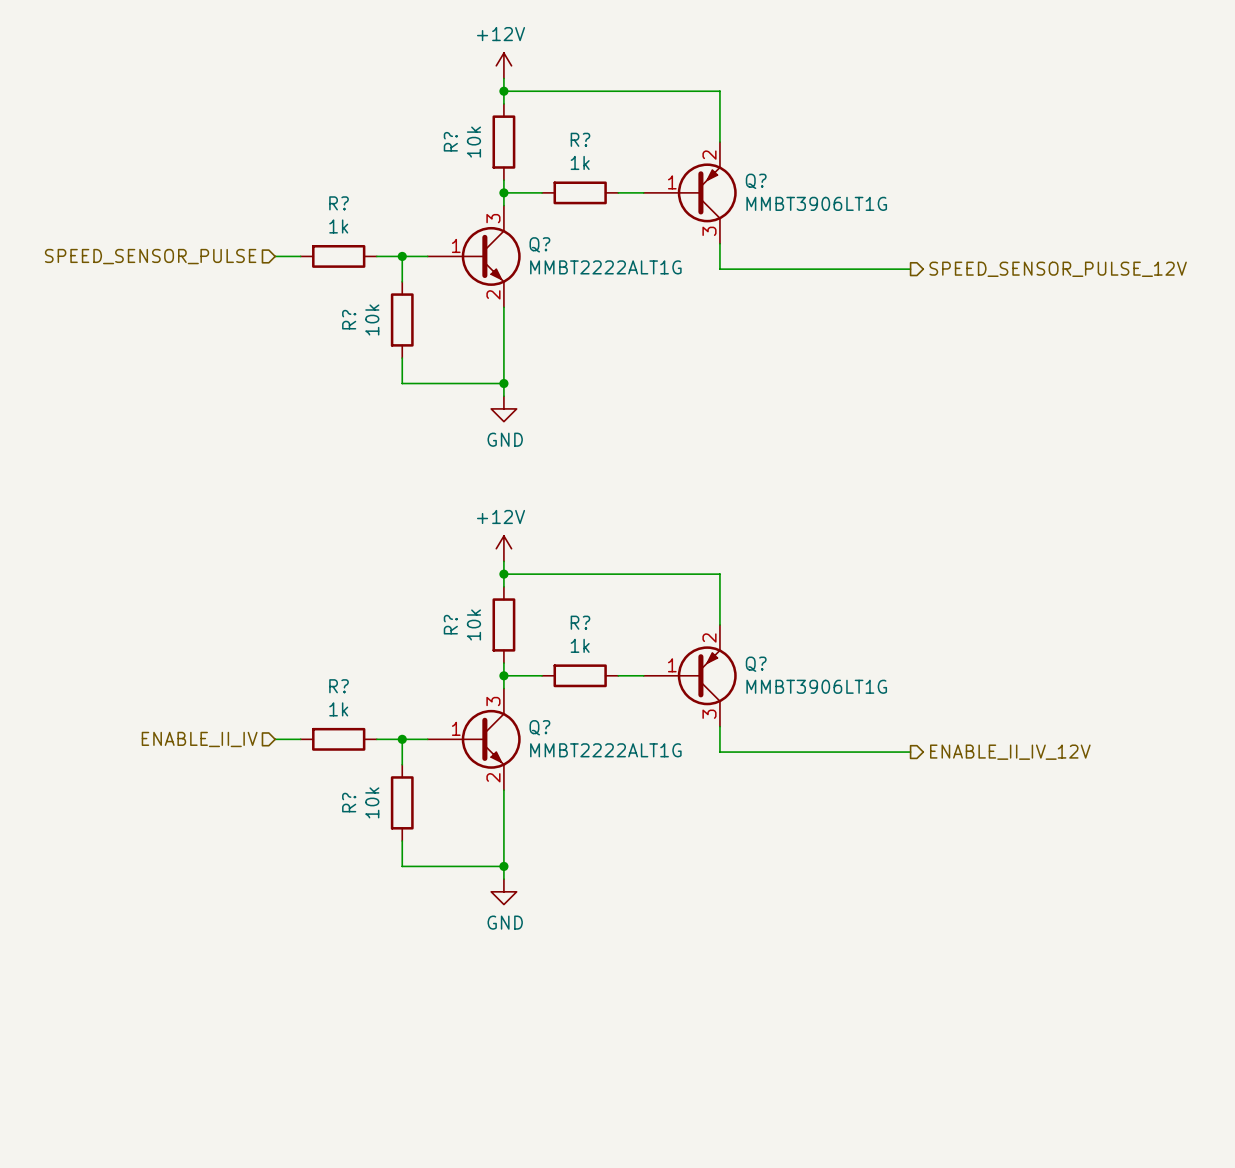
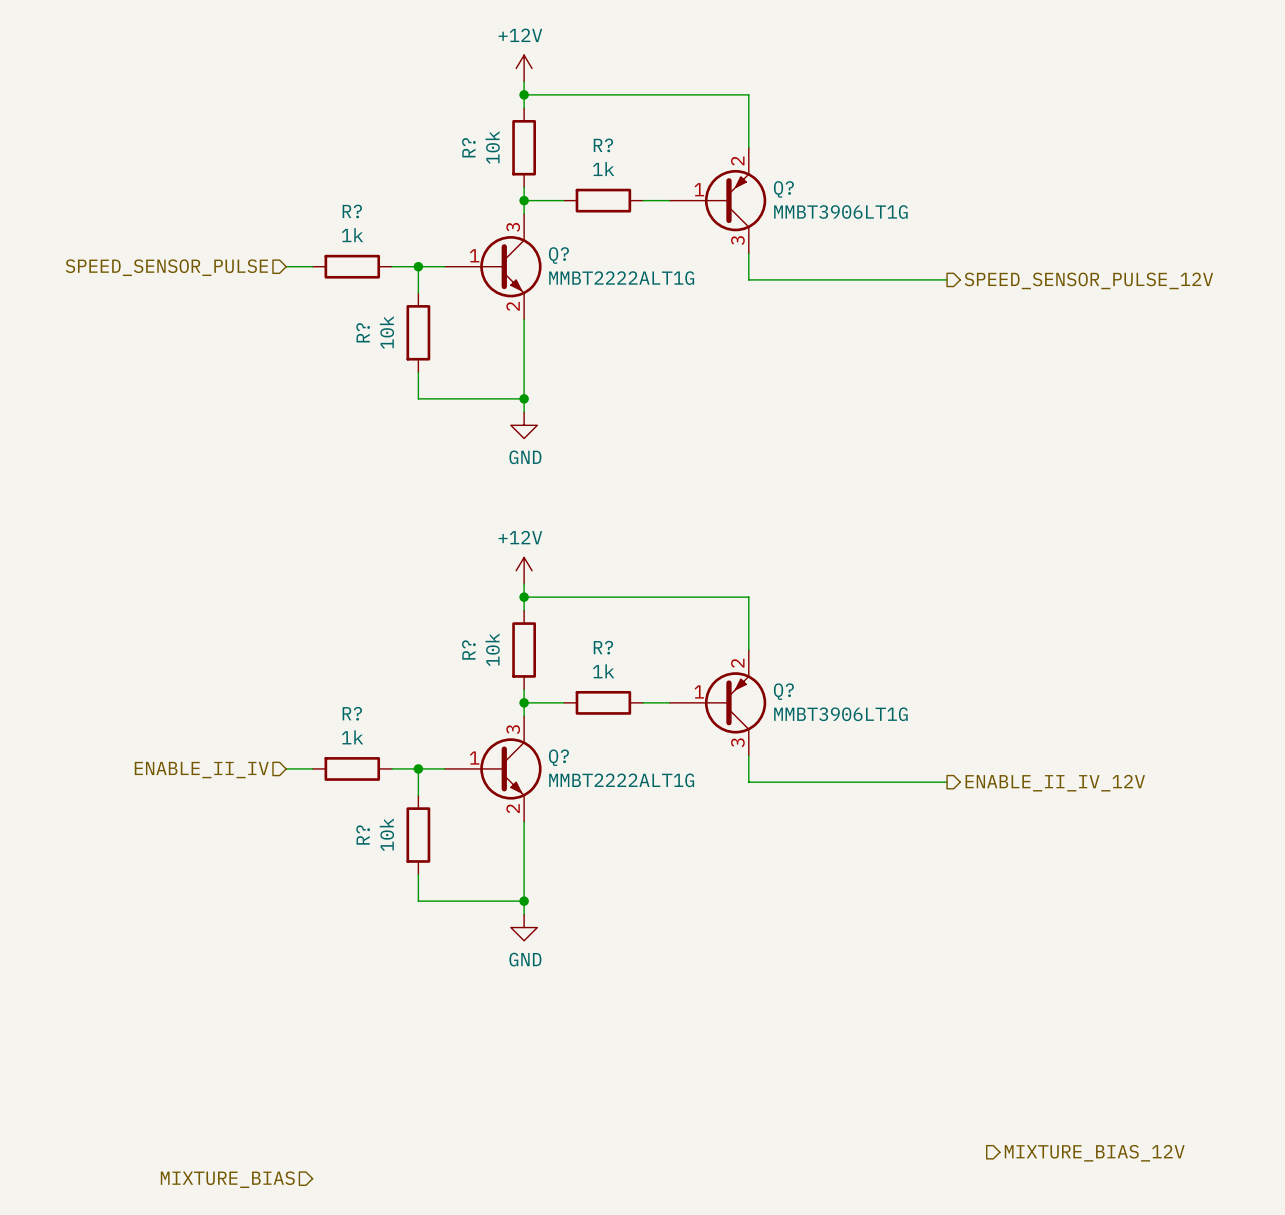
hierarchical label: none -> MIXTURE_BIAS_12V (1094, 1153)
hierarchical label: none -> MIXTURE_BIAS (227, 1179)

